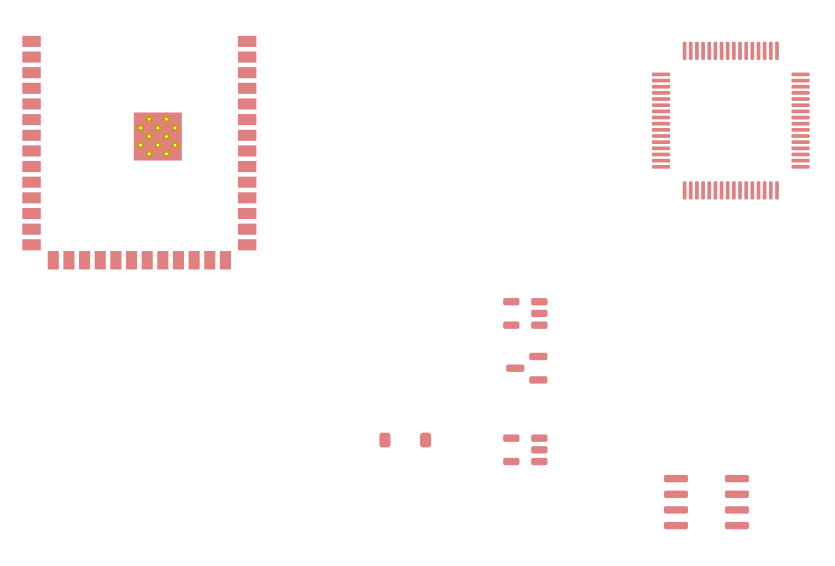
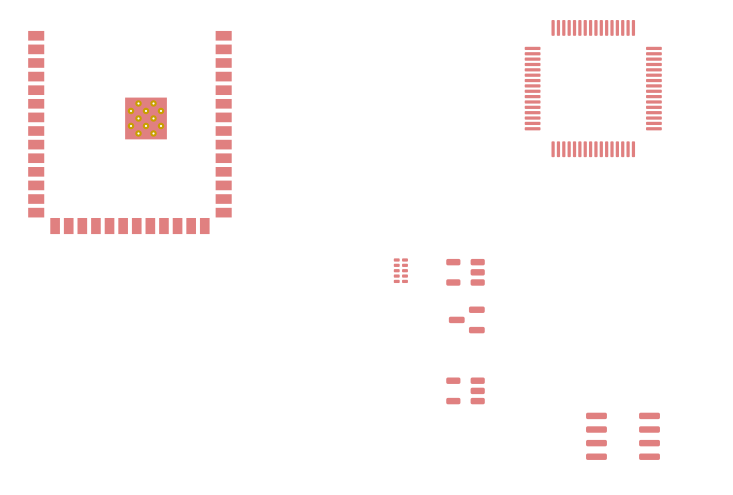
part position: (730, 120) -> (593, 88)
part: none -> (400, 270)
part: (405, 440) -> none

